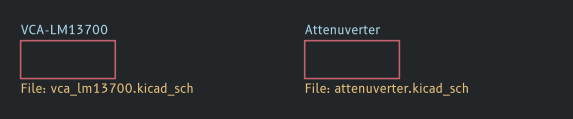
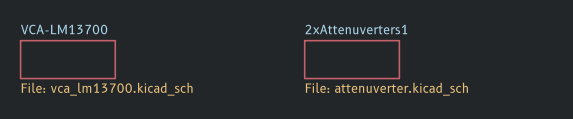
sheet Attenuverter name: Attenuverter (342, 29) -> 2xAttenuverters1 (356, 29)

